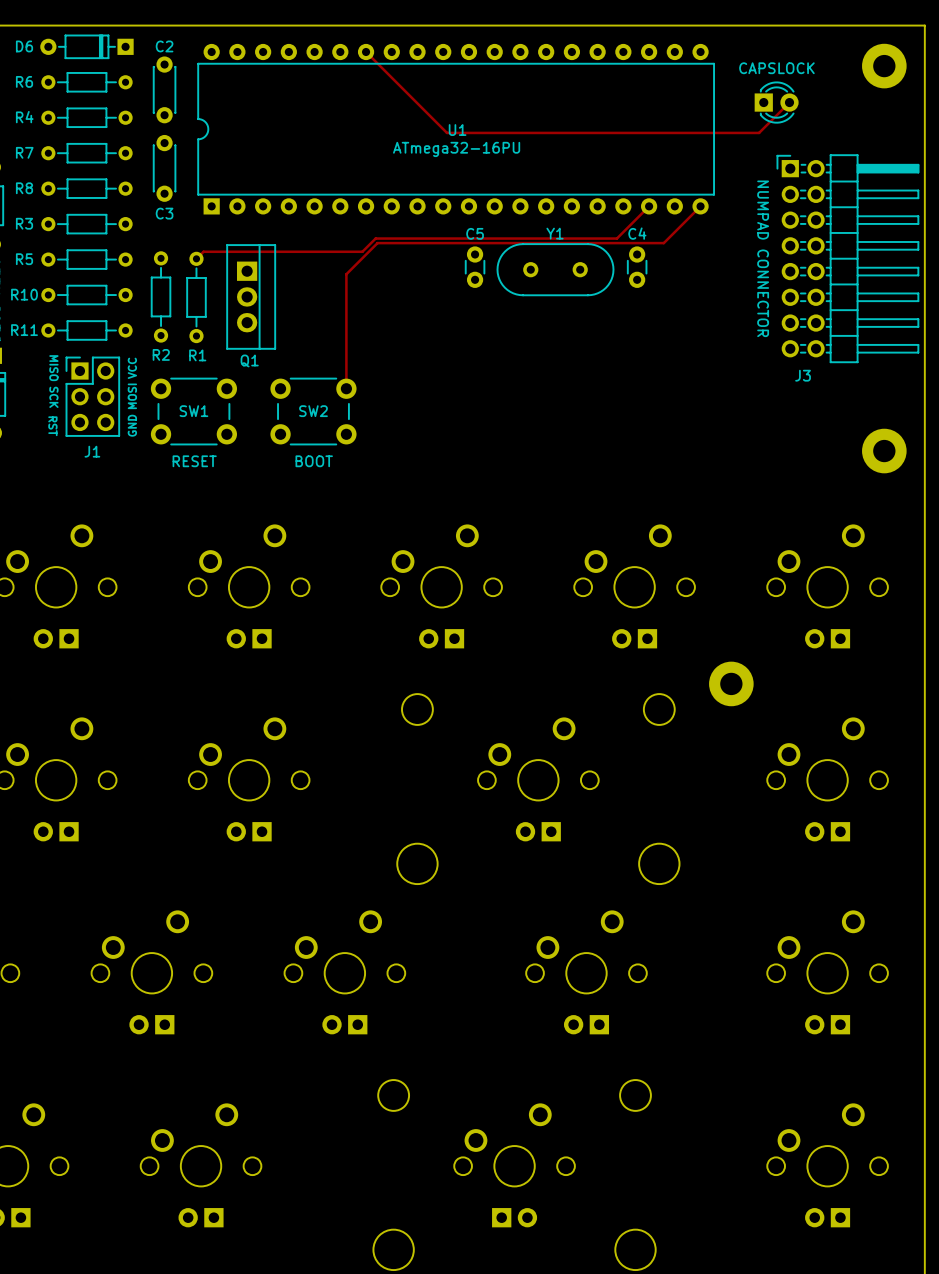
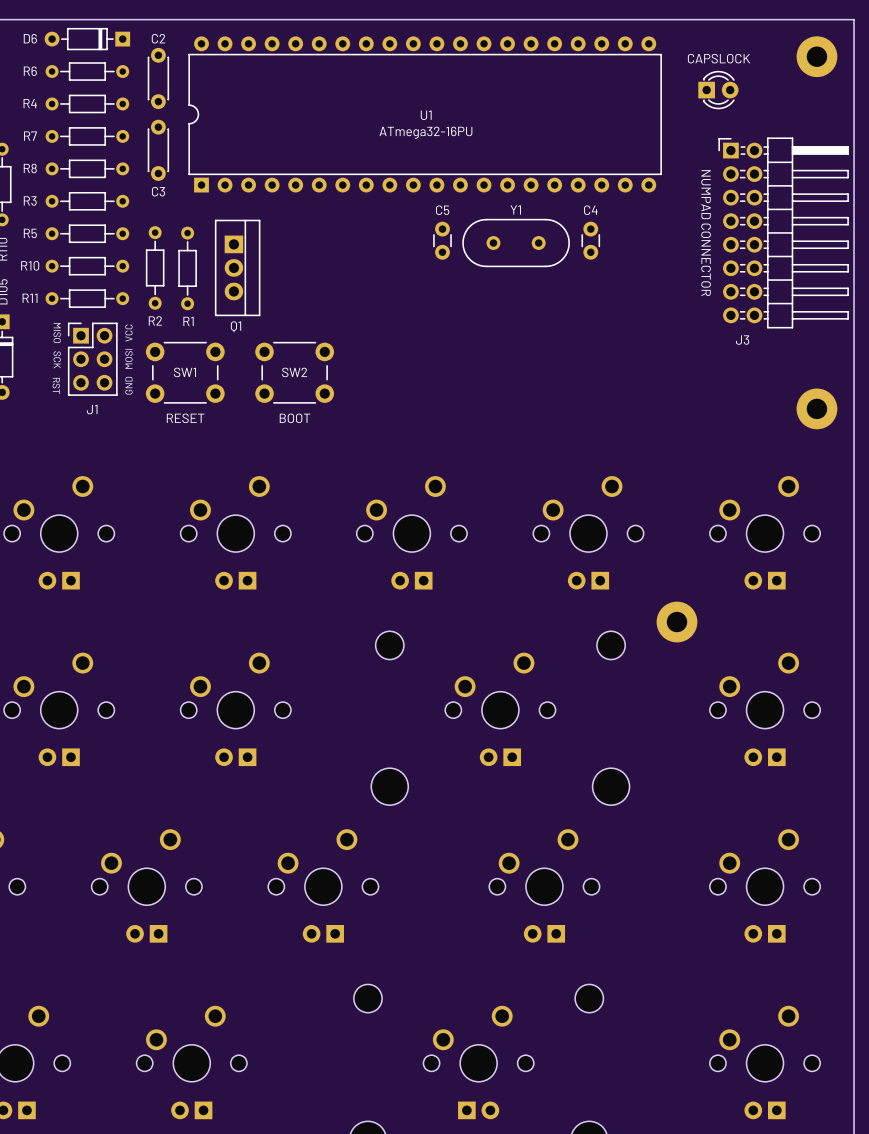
track: (366, 52) (447, 132) (759, 132) (789, 102) -> none
track: (649, 206) (616, 238) (375, 238) (362, 251) (203, 251) (196, 258) -> none
track: (700, 206) (663, 243) (377, 243) (346, 274) (346, 388) -> none

